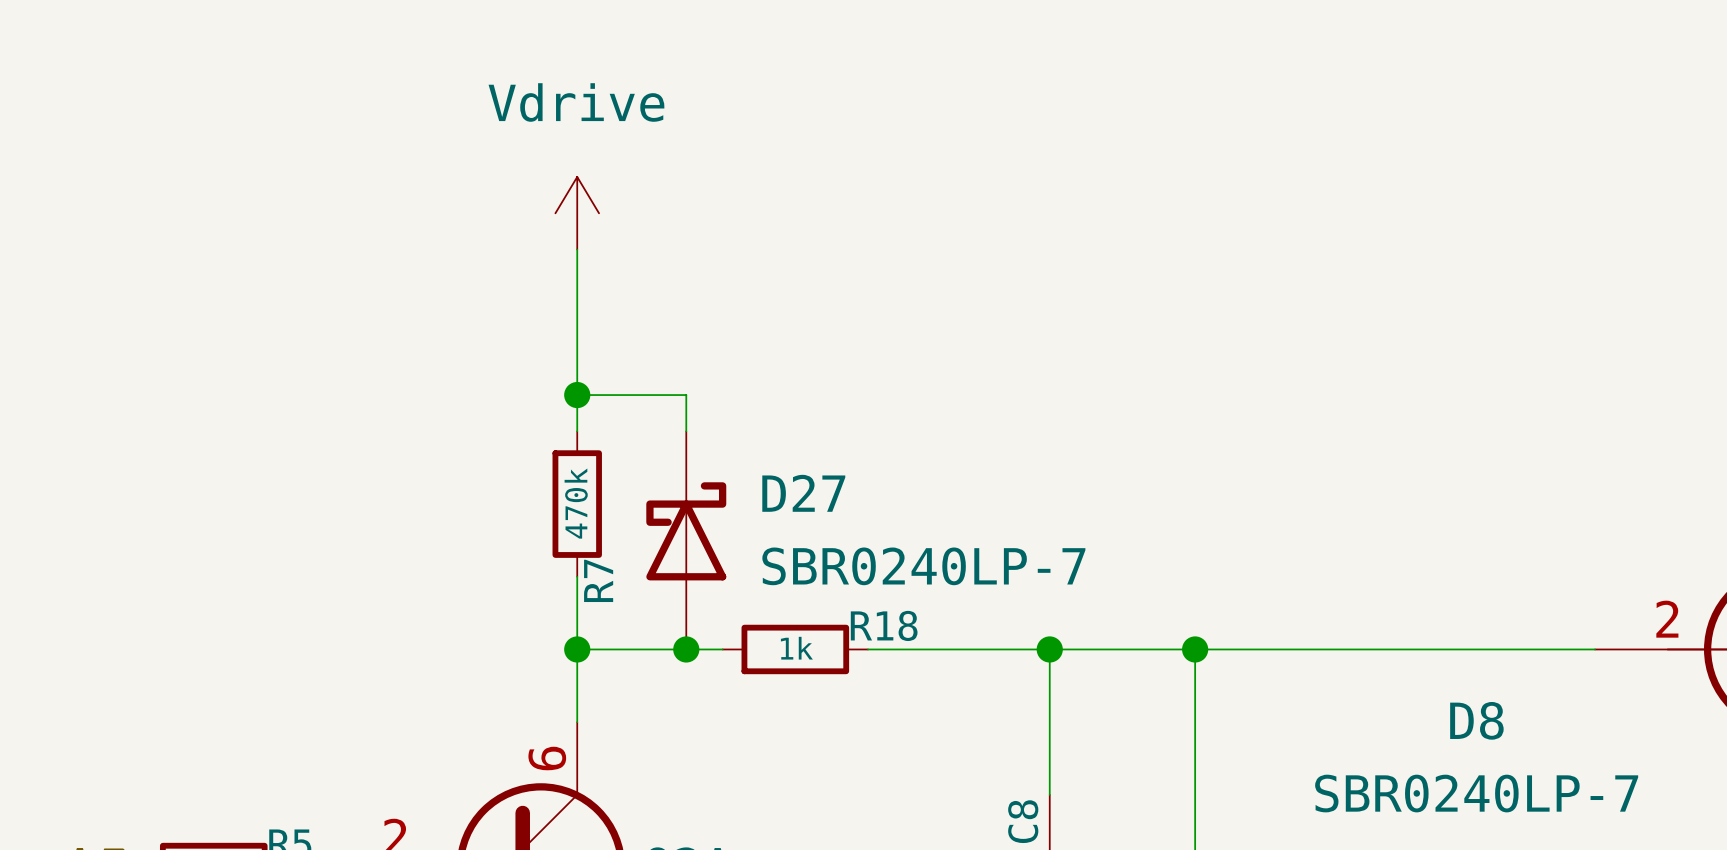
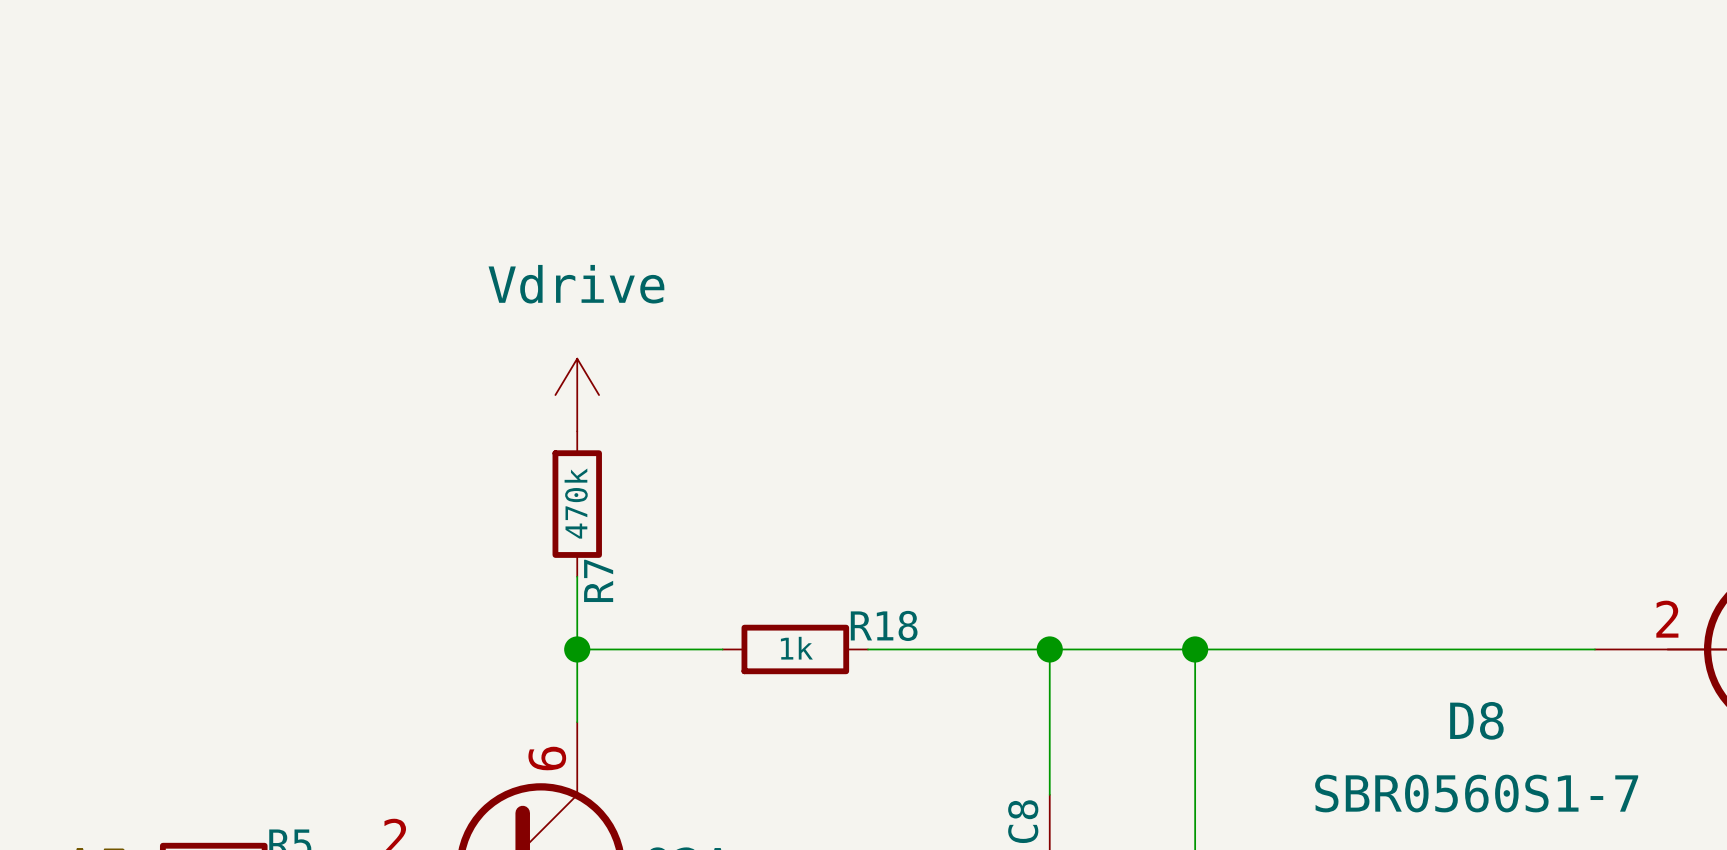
power symbol position: Vdrive (577, 213) -> Vdrive (577, 395)
wire: (577, 249) (577, 431) -> none
wire: (577, 395) (686, 395) (686, 431) -> none
junction: (577, 395) -> none
D27: SBR0240LP-7 (686, 540) -> none
junction: (686, 649) -> none
D8 value: SBR0240LP-7 (1476, 793) -> SBR0560S1-7 (1476, 793)

